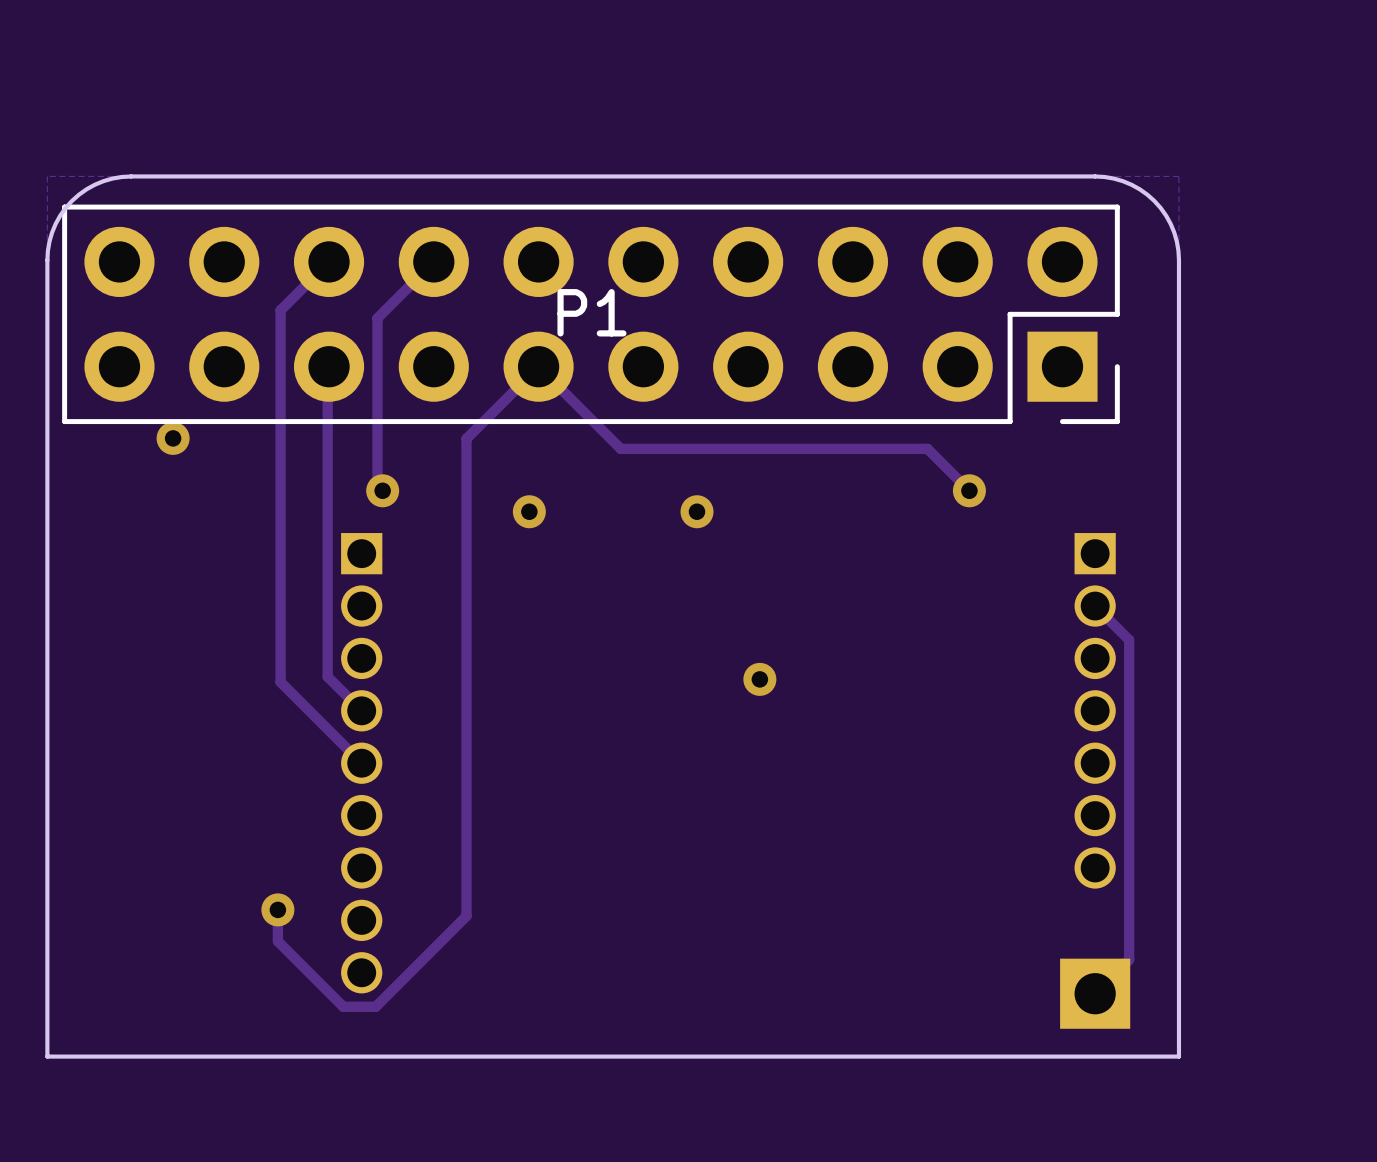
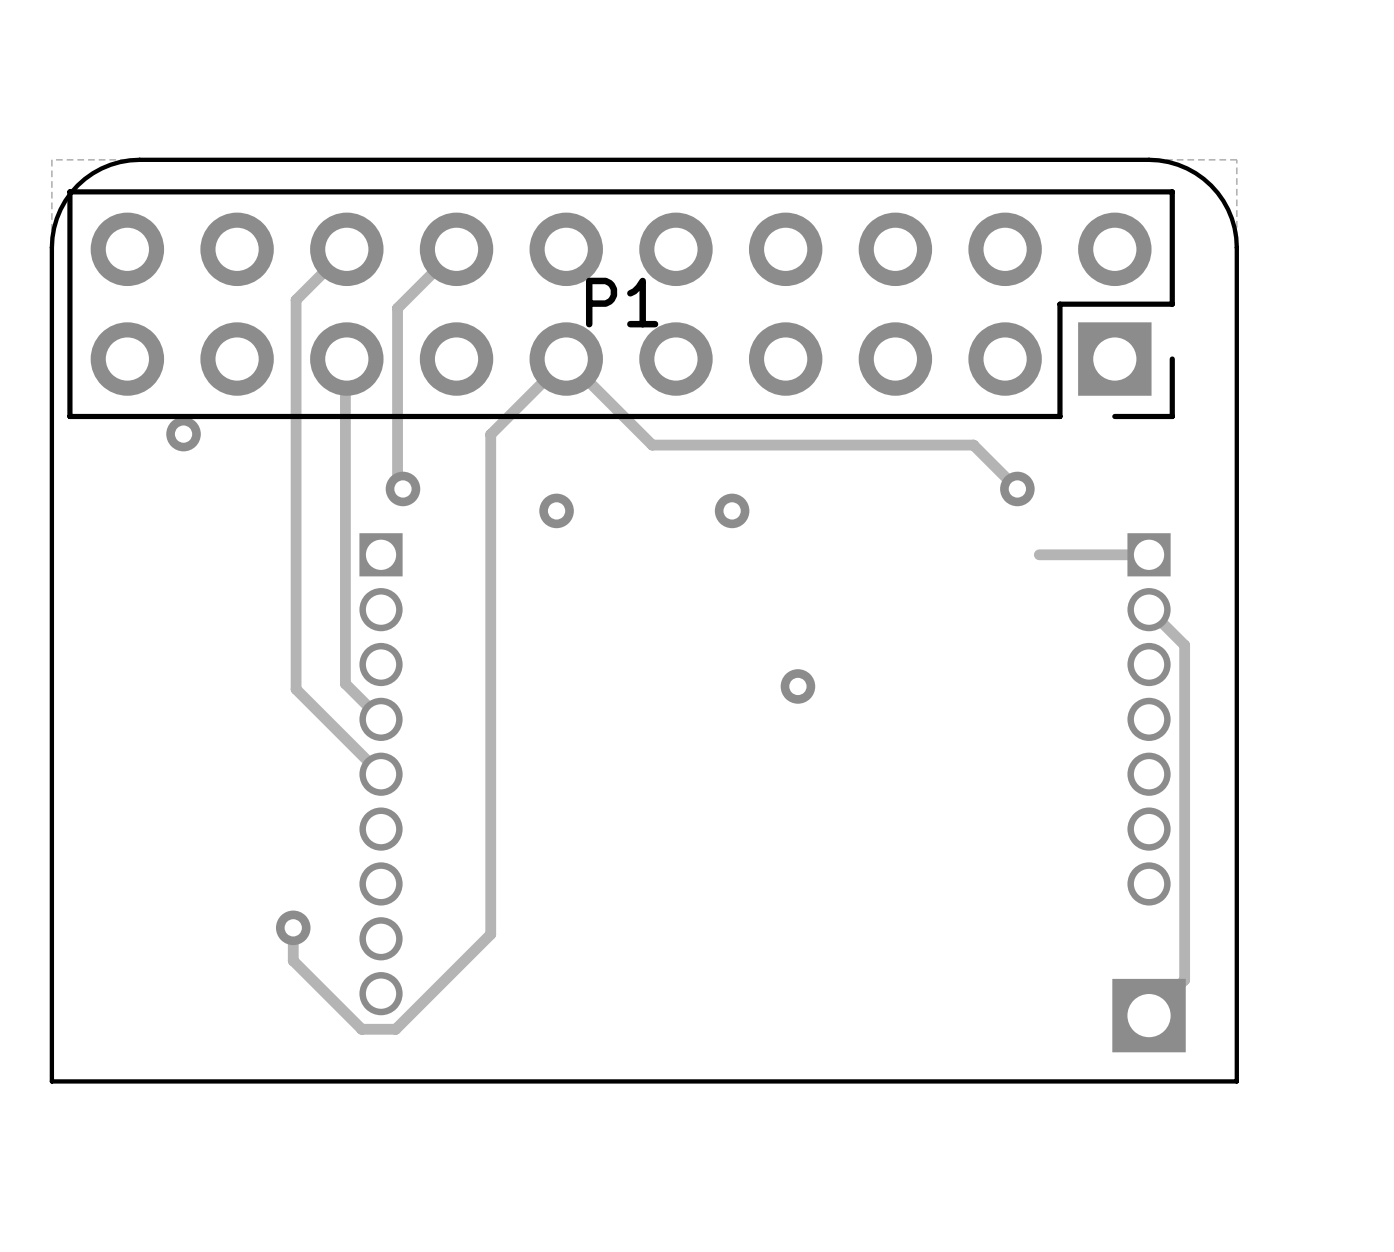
track: none -> (1149, 554) (1039, 554)

